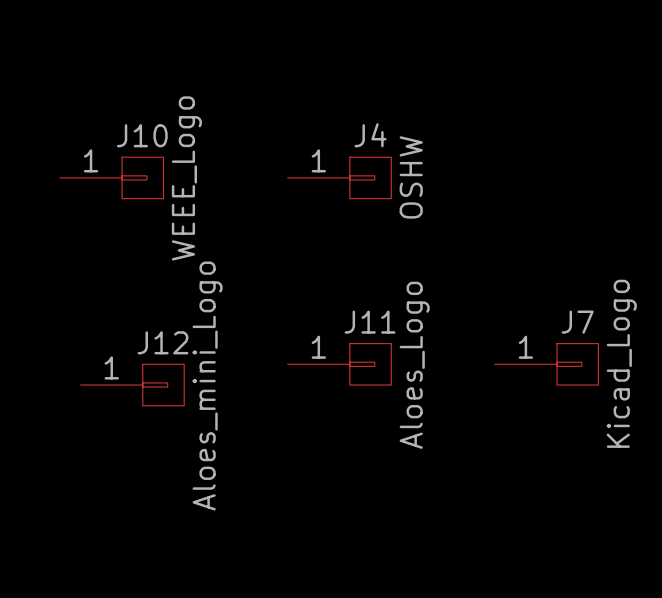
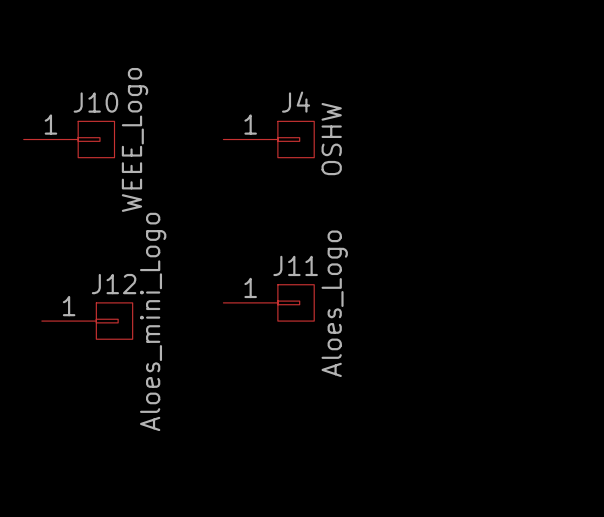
J7: Kicad_Logo (546, 364) -> none

